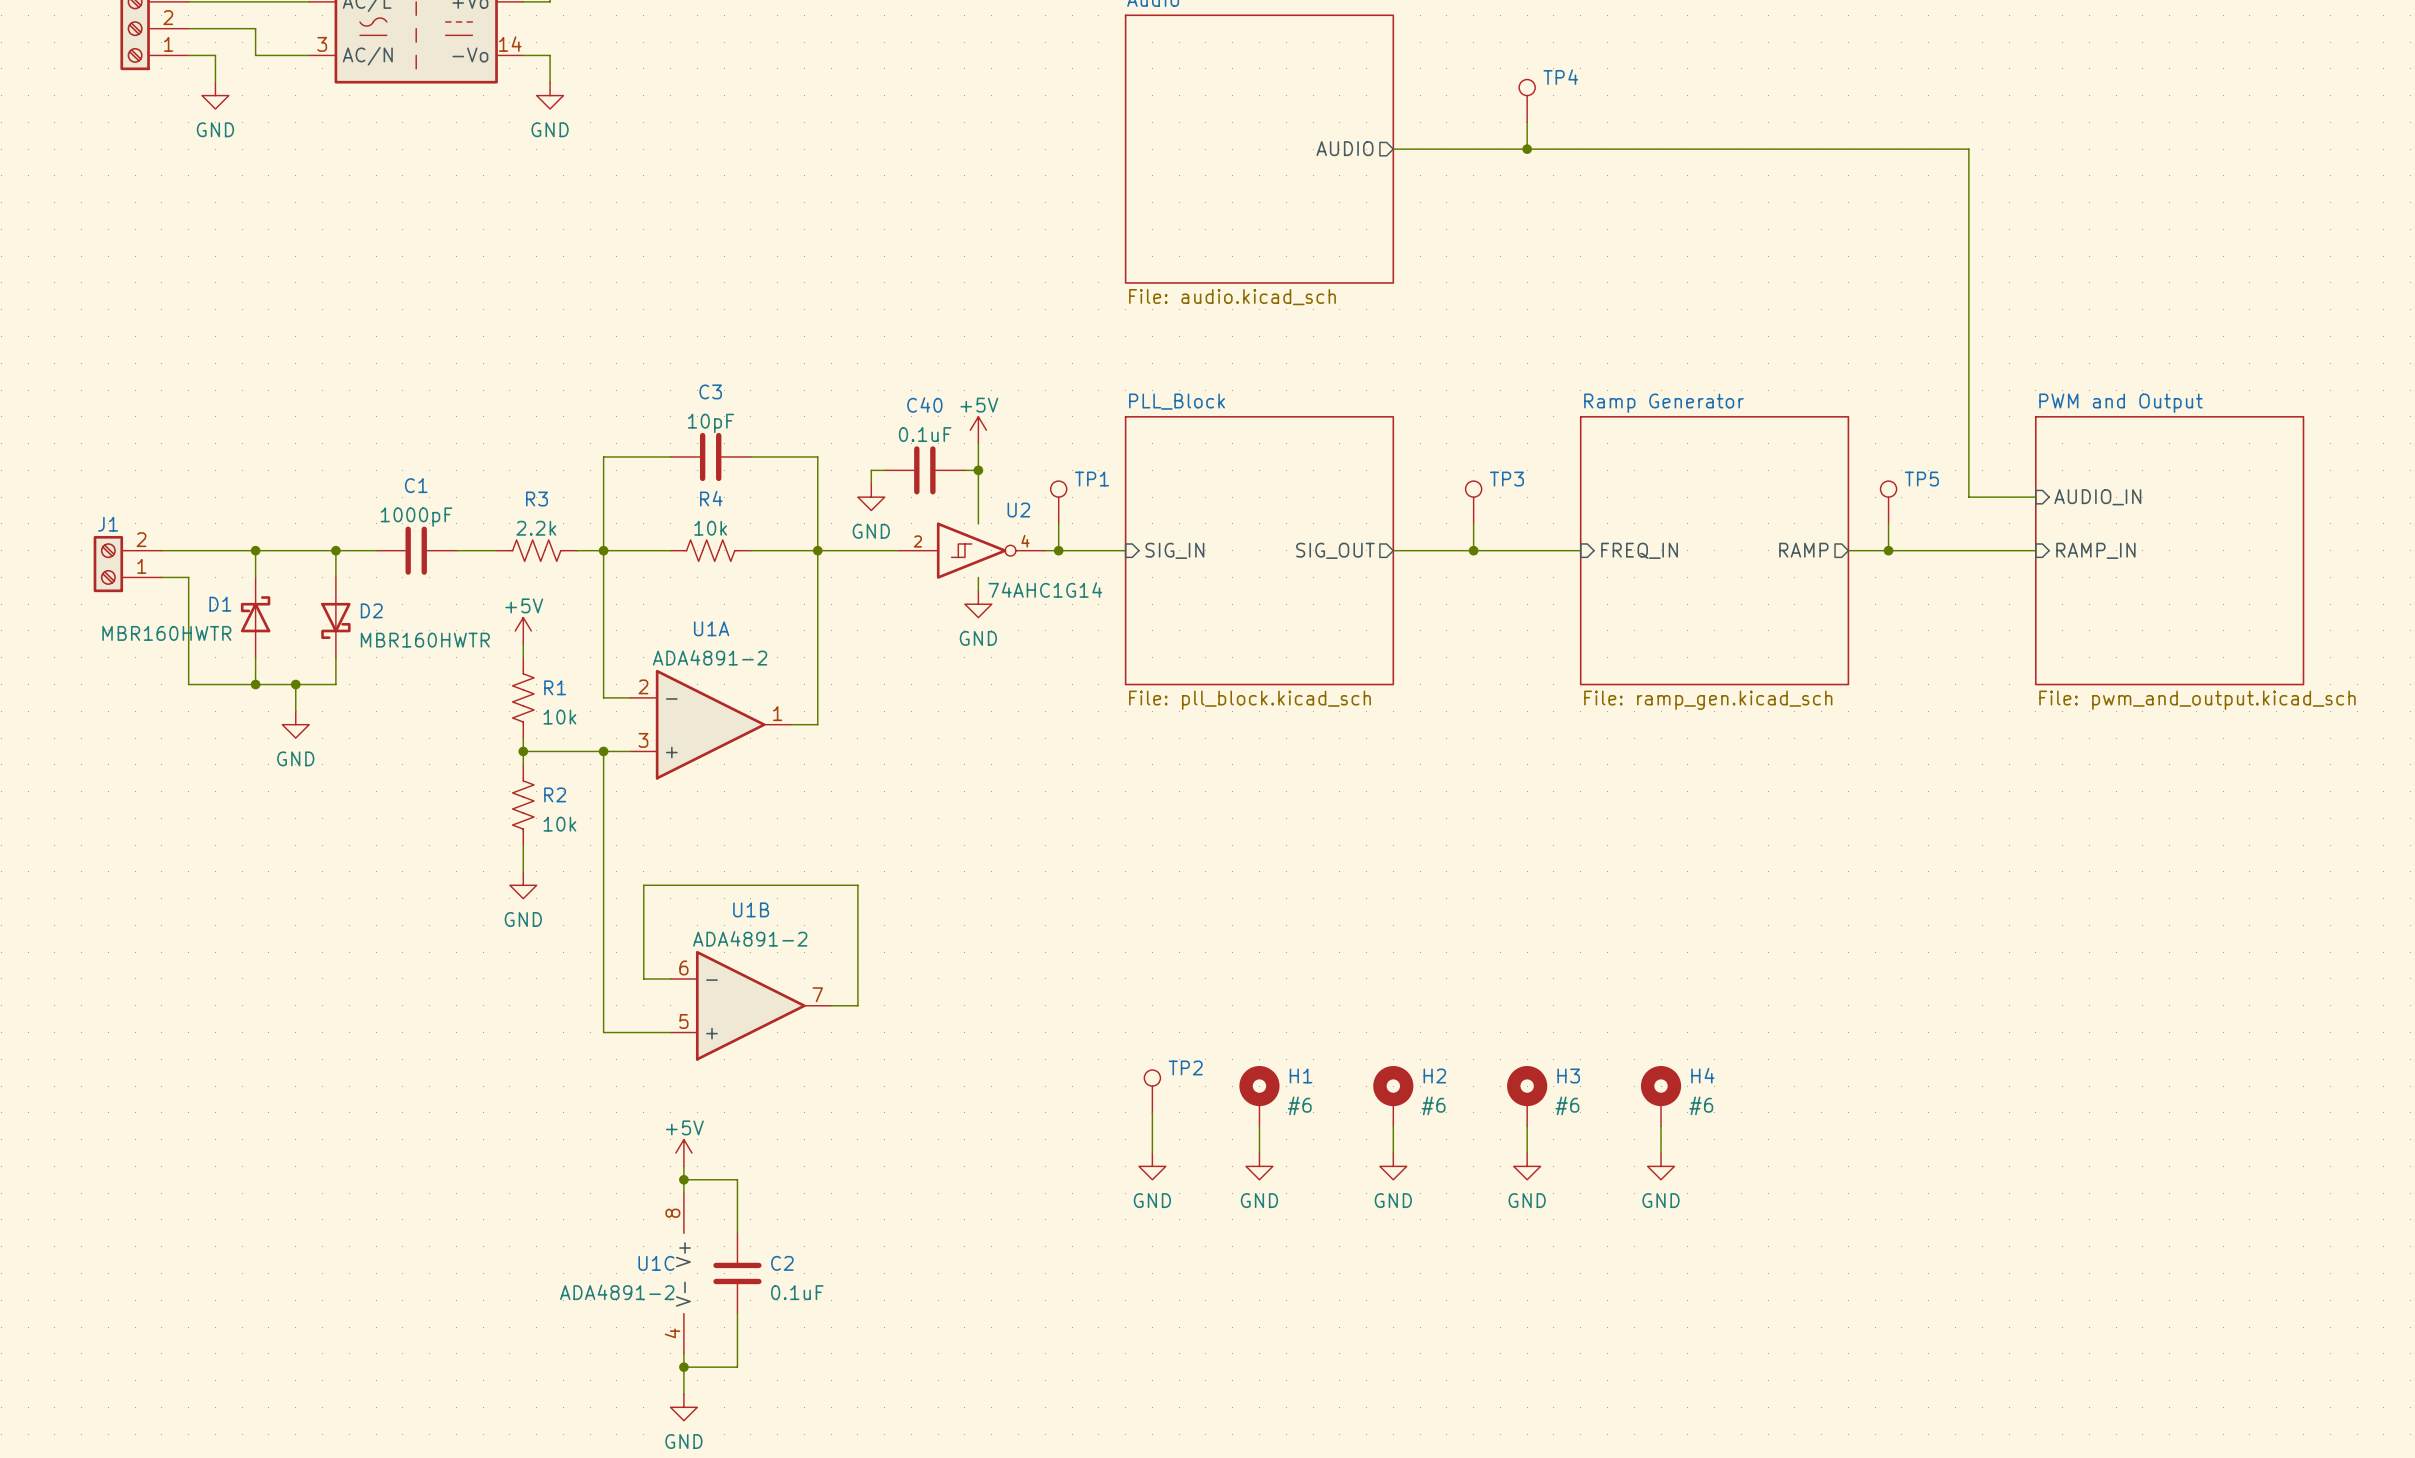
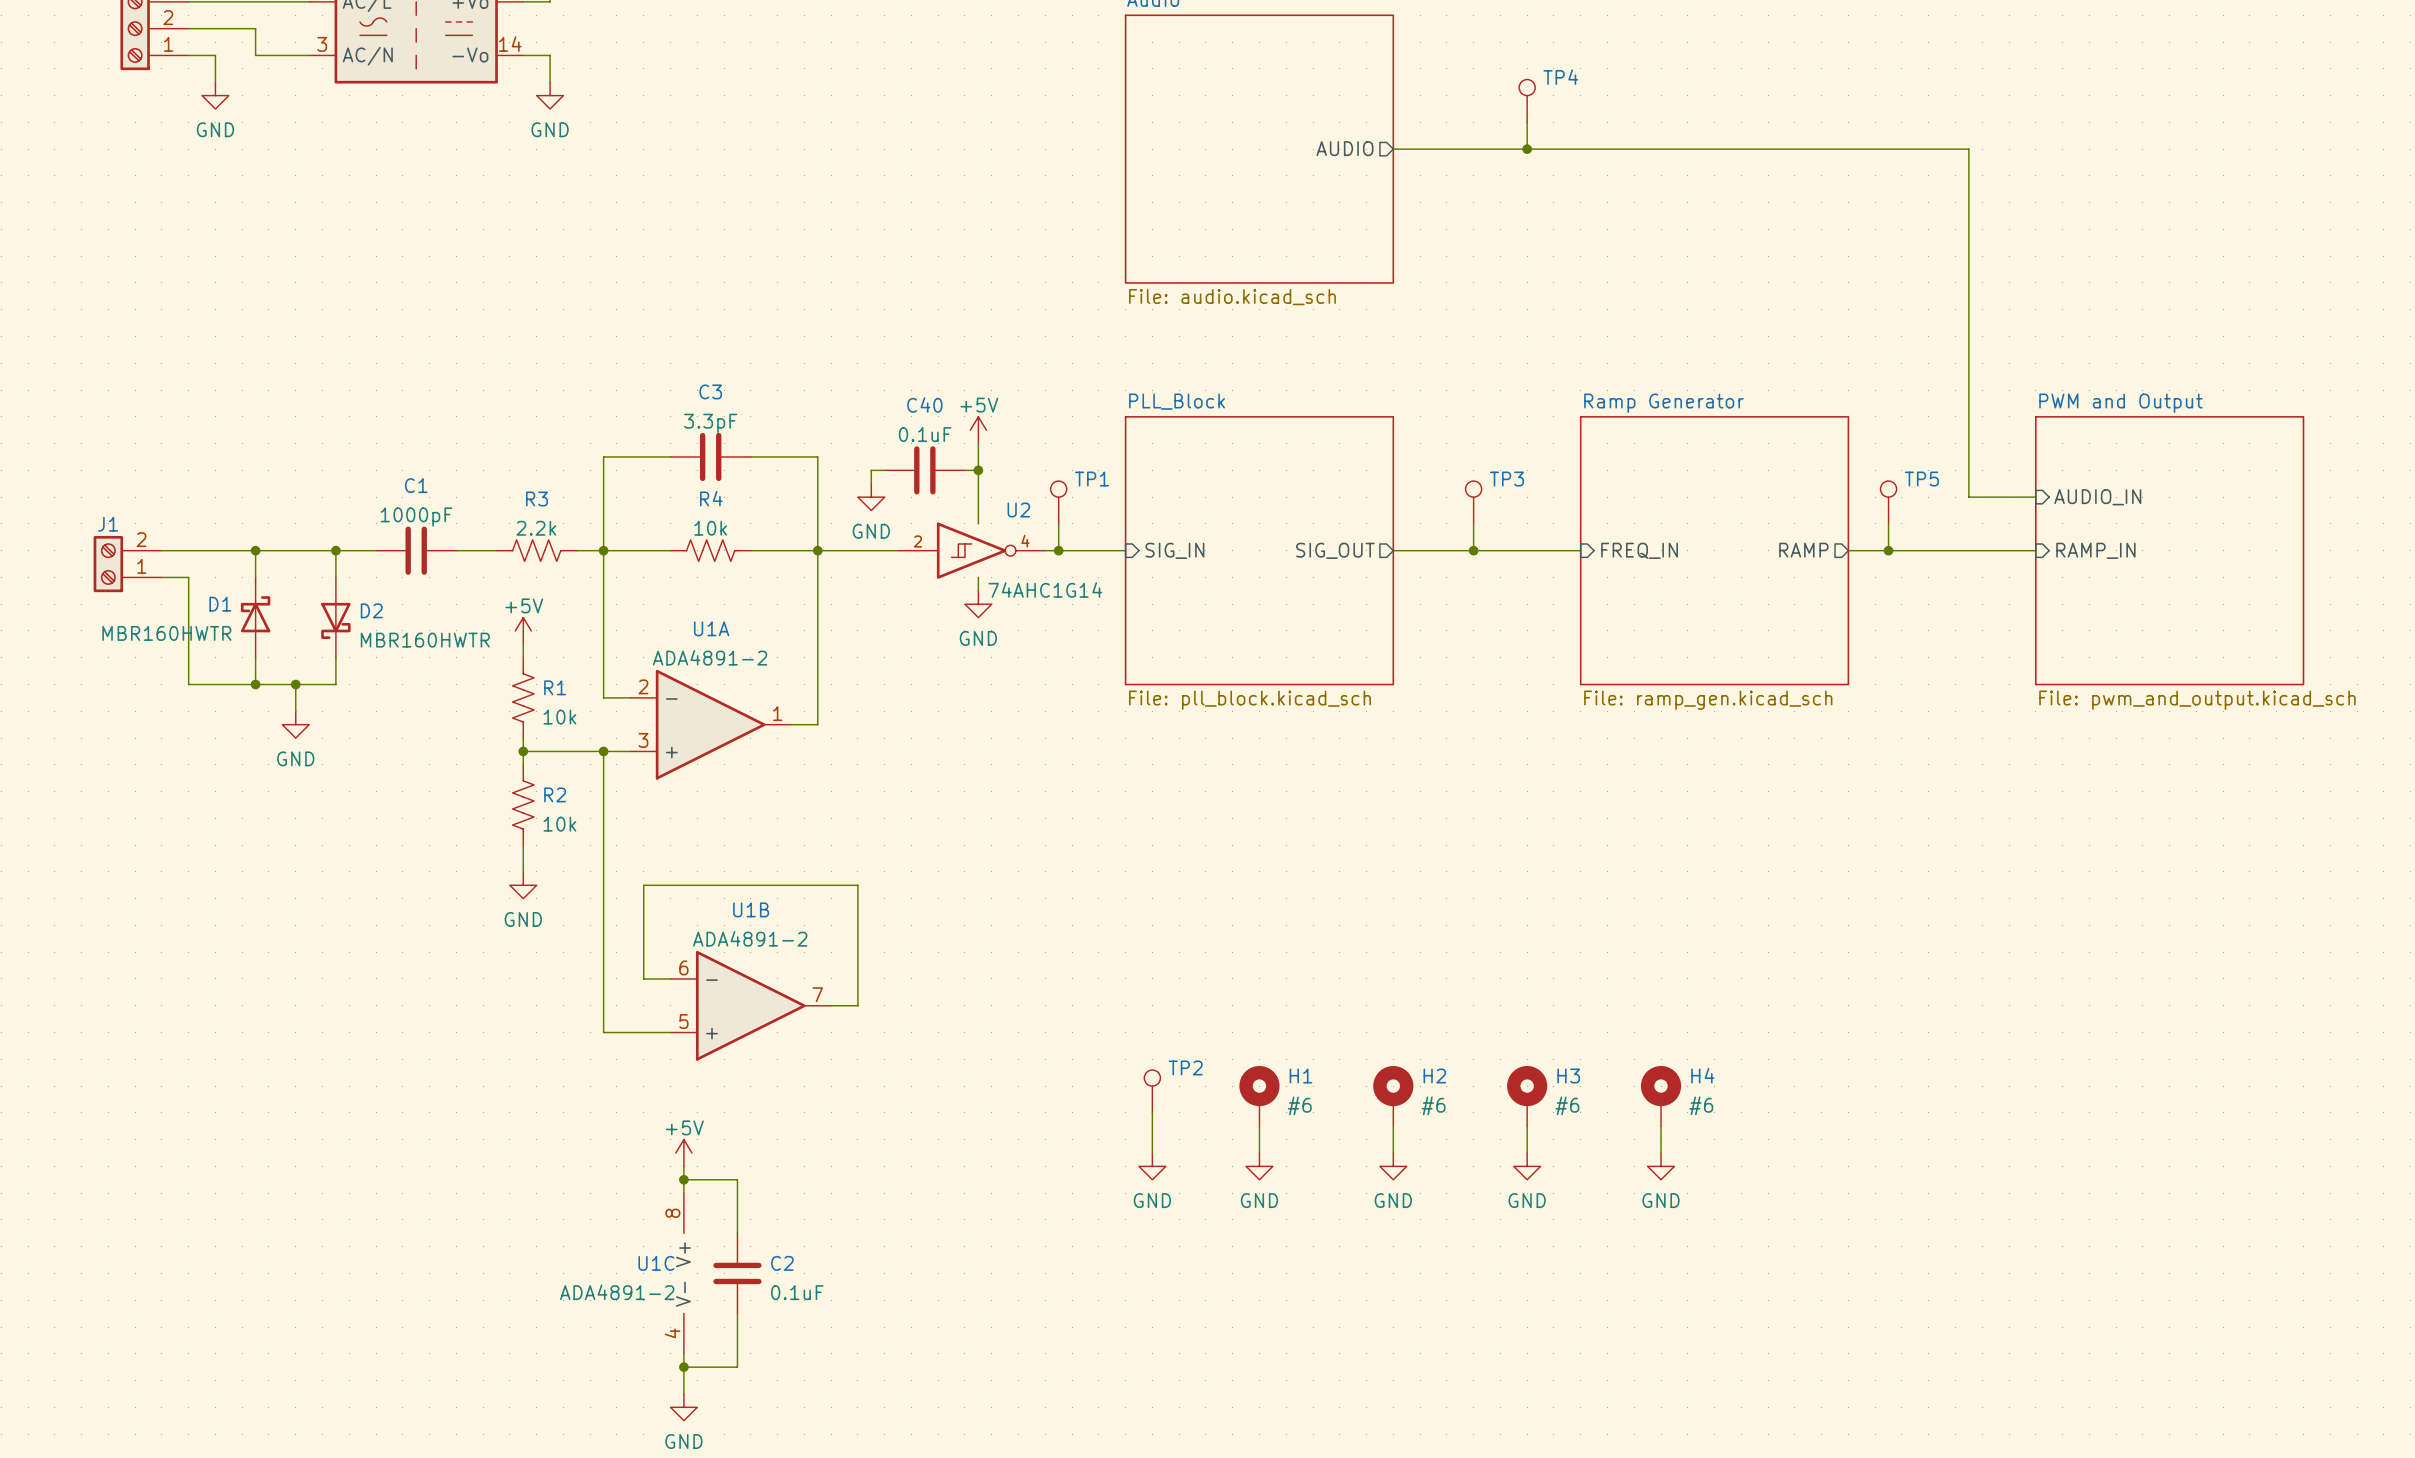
C3 value: 10pF (711, 423) -> 3.3pF (710, 423)

